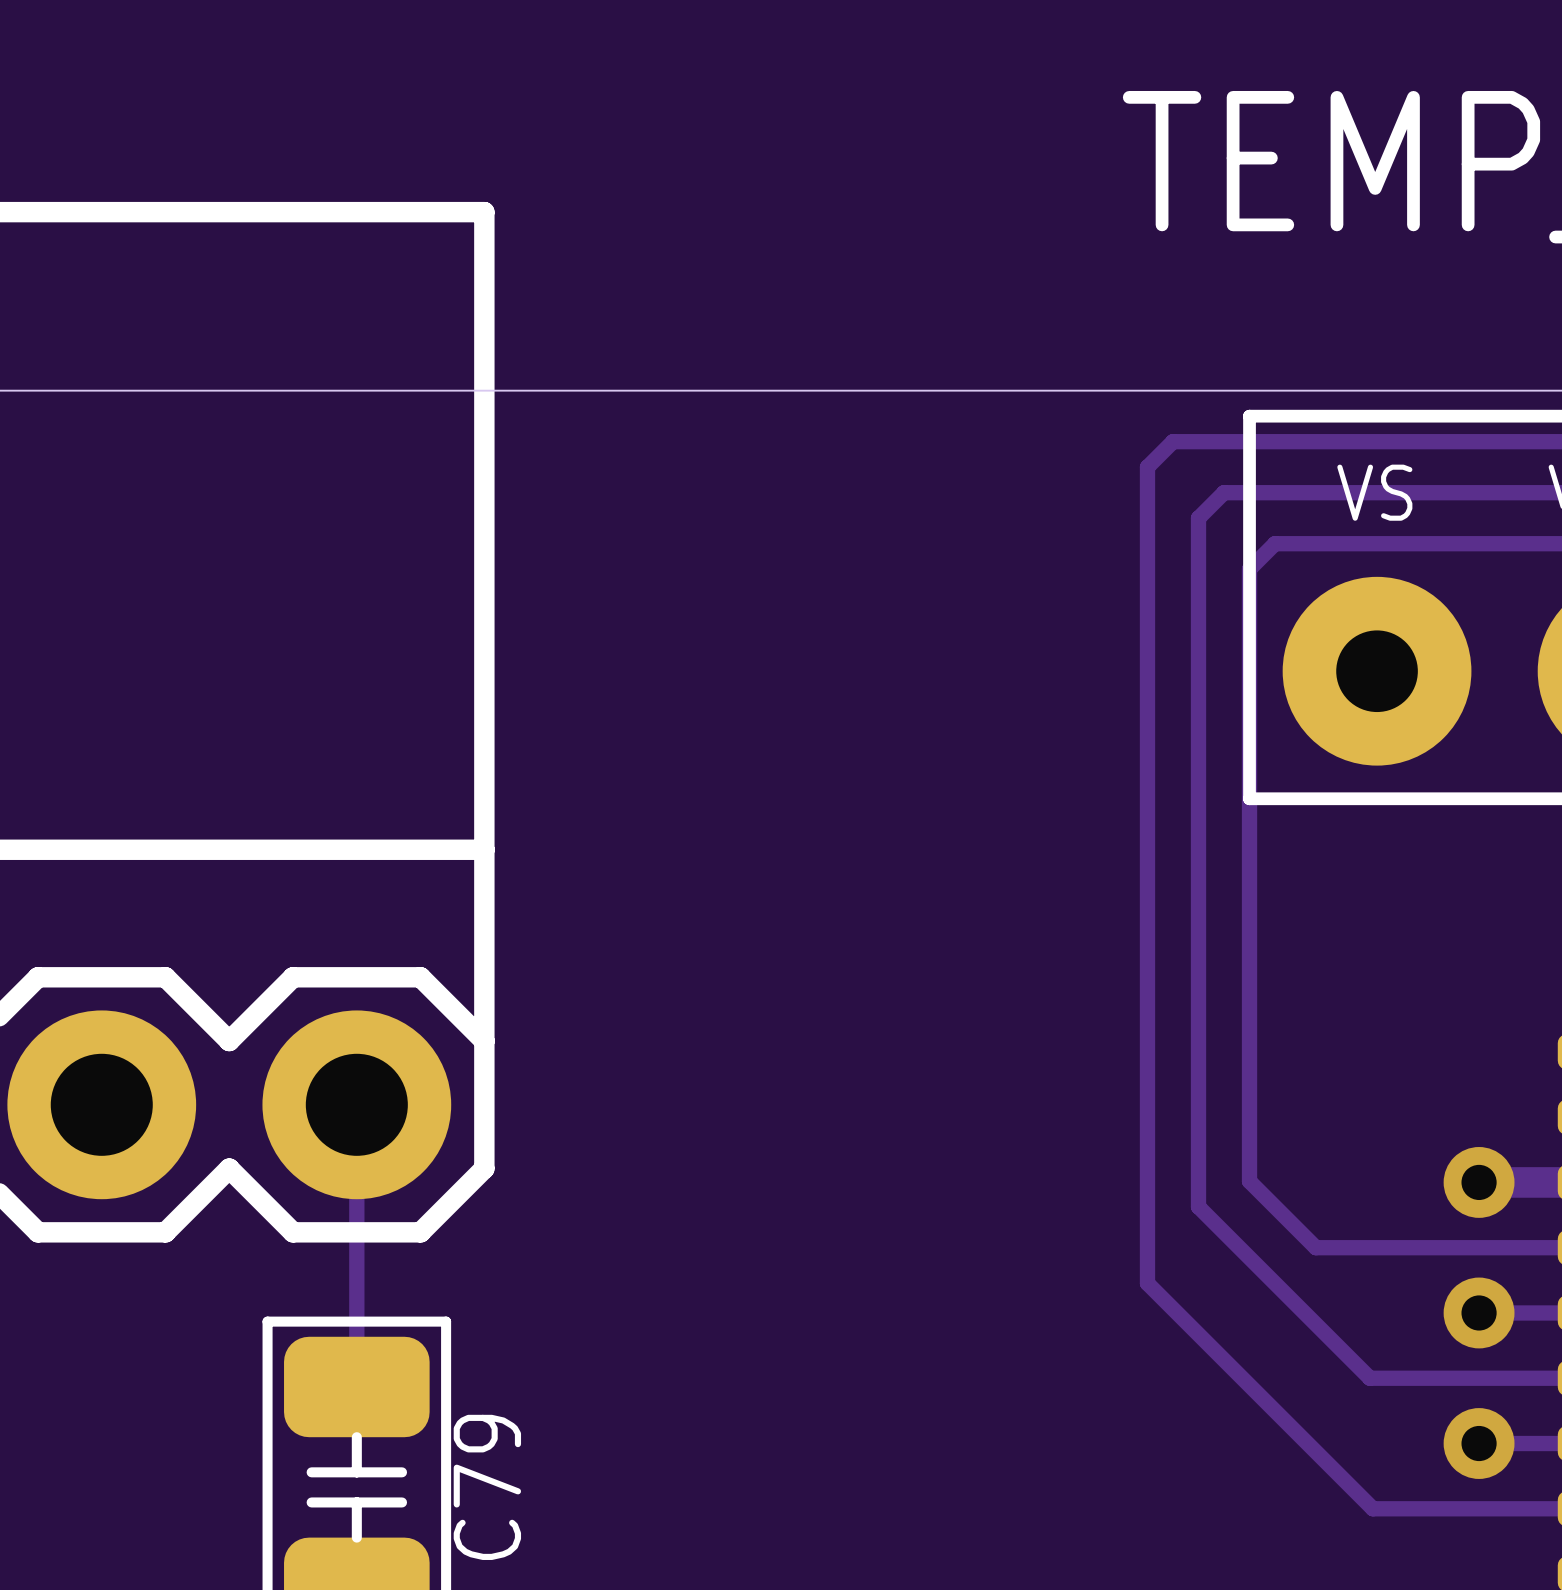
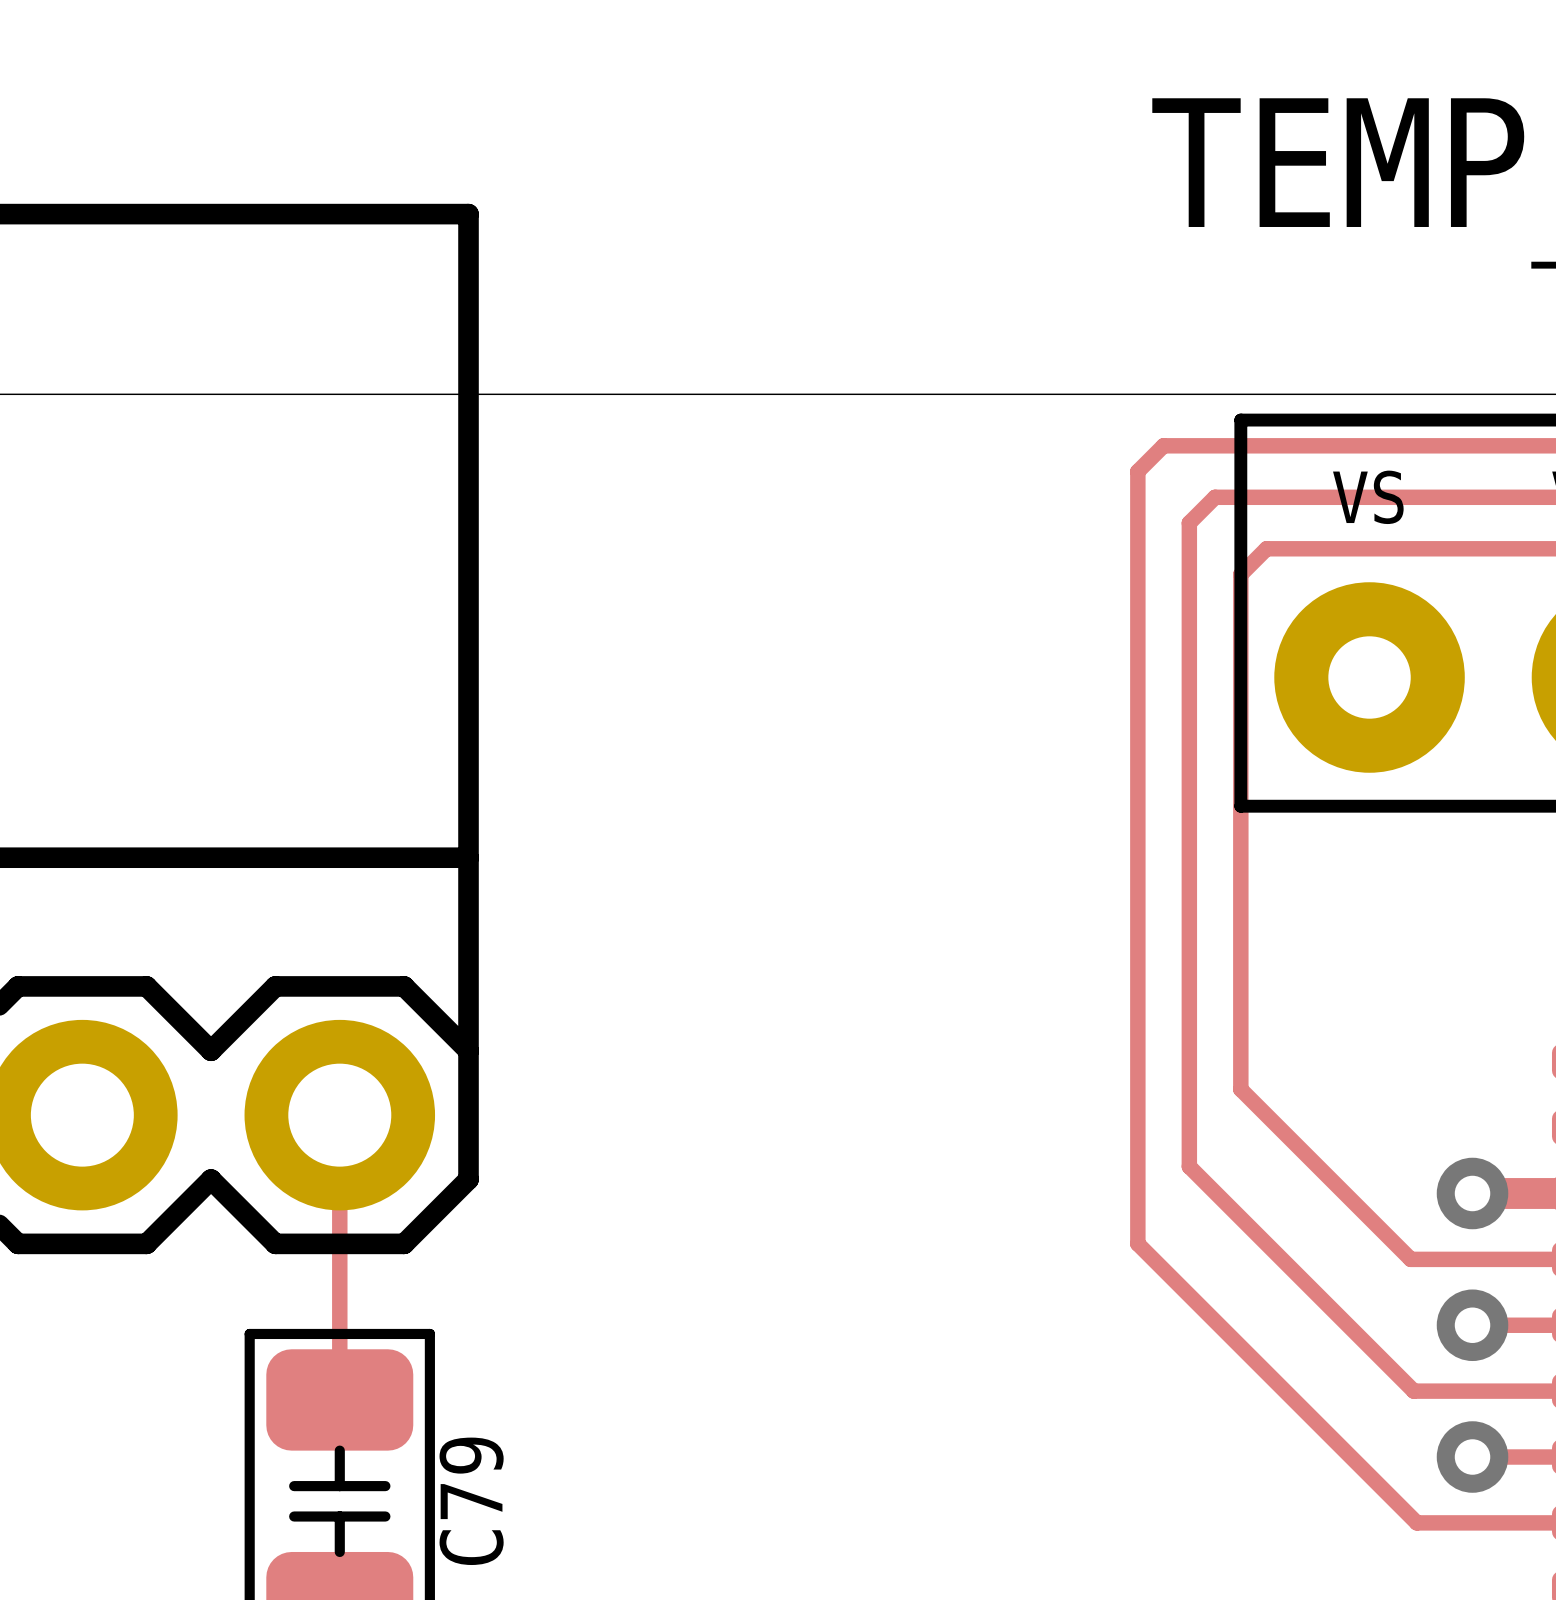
track: (1249, 1079) (1249, 1181) (1315, 1247) (1417, 1247) -> (1240, 1089) (1410, 1259)
track: (1198, 1155) (1198, 1206) (1369, 1378) (1420, 1378) -> (1189, 1166) (1413, 1391)
track: (1147, 1232) (1147, 1283) (1372, 1508) (1423, 1508) -> (1137, 1243) (1416, 1522)

